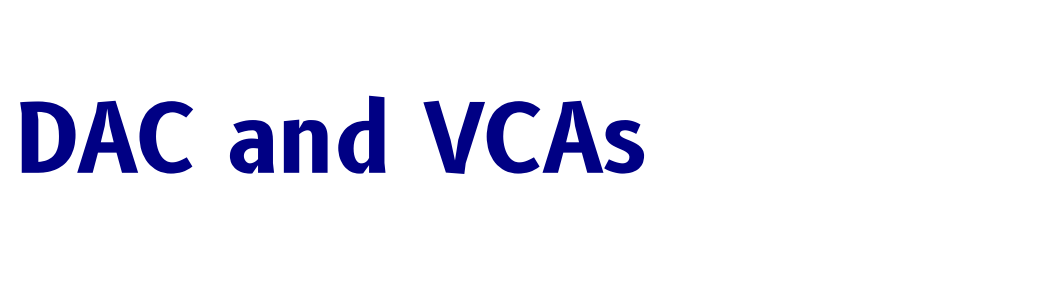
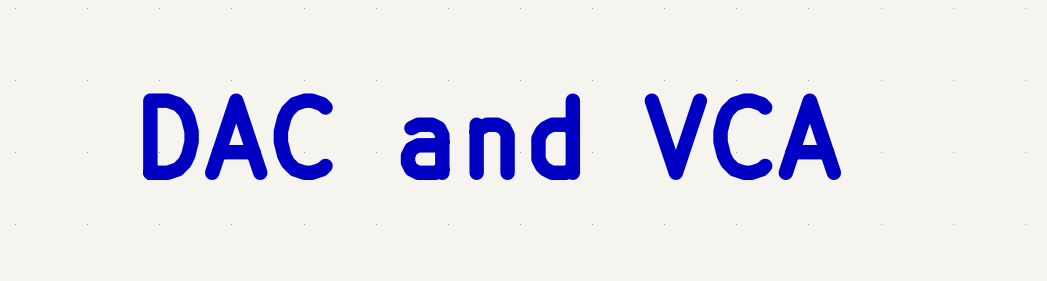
text: DAC and VCAs (332, 134) -> DAC and VCA (492, 136)

